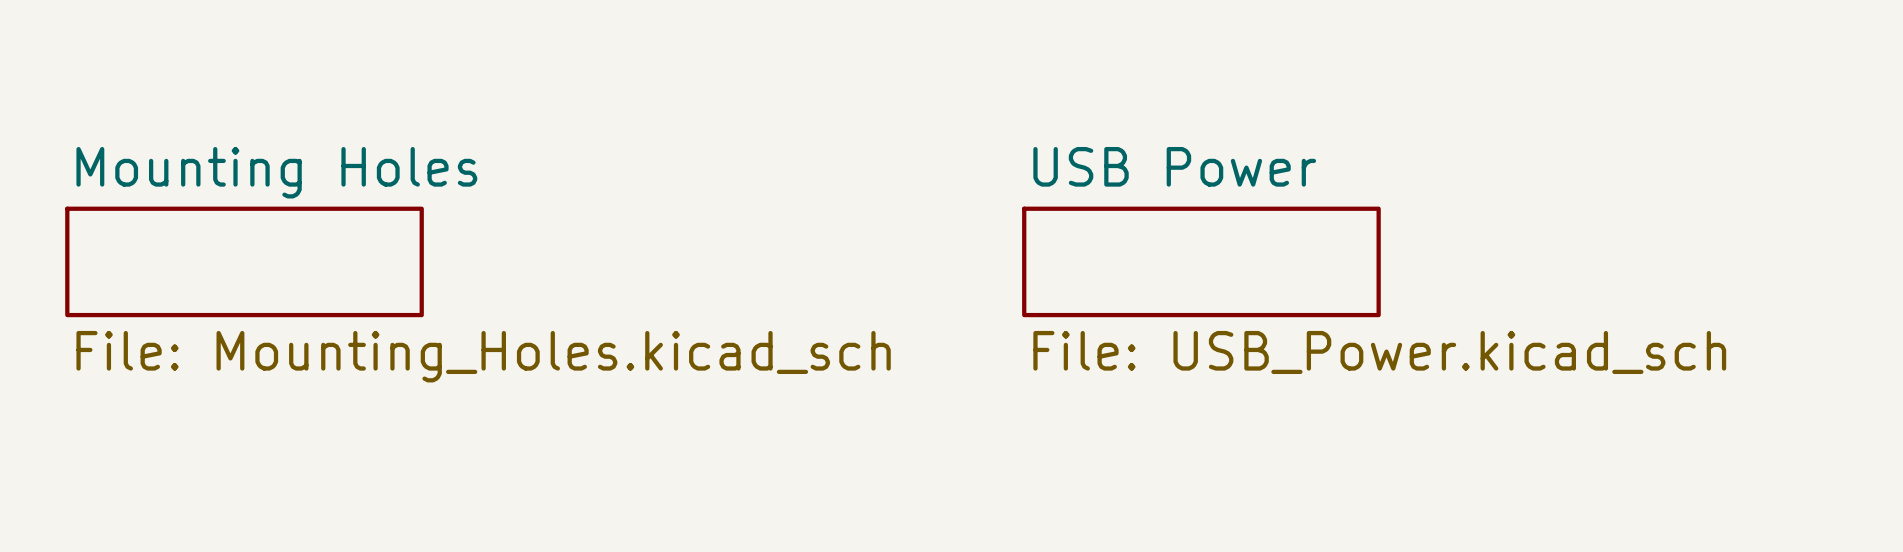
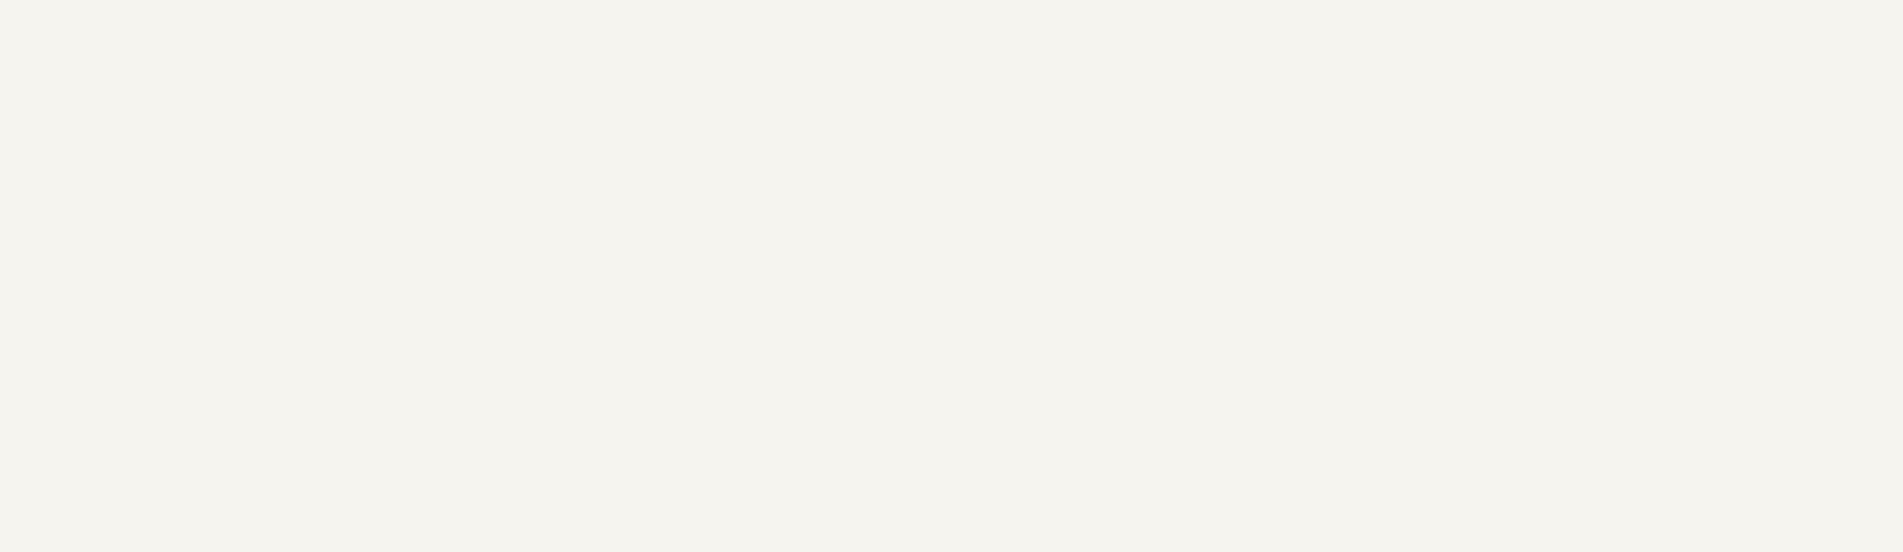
sheet Mounting Holes: File: Mounting_Holes.kicad_sch (244, 261) -> none
sheet USB Power: File: USB_Power.kicad_sch (1201, 261) -> none

